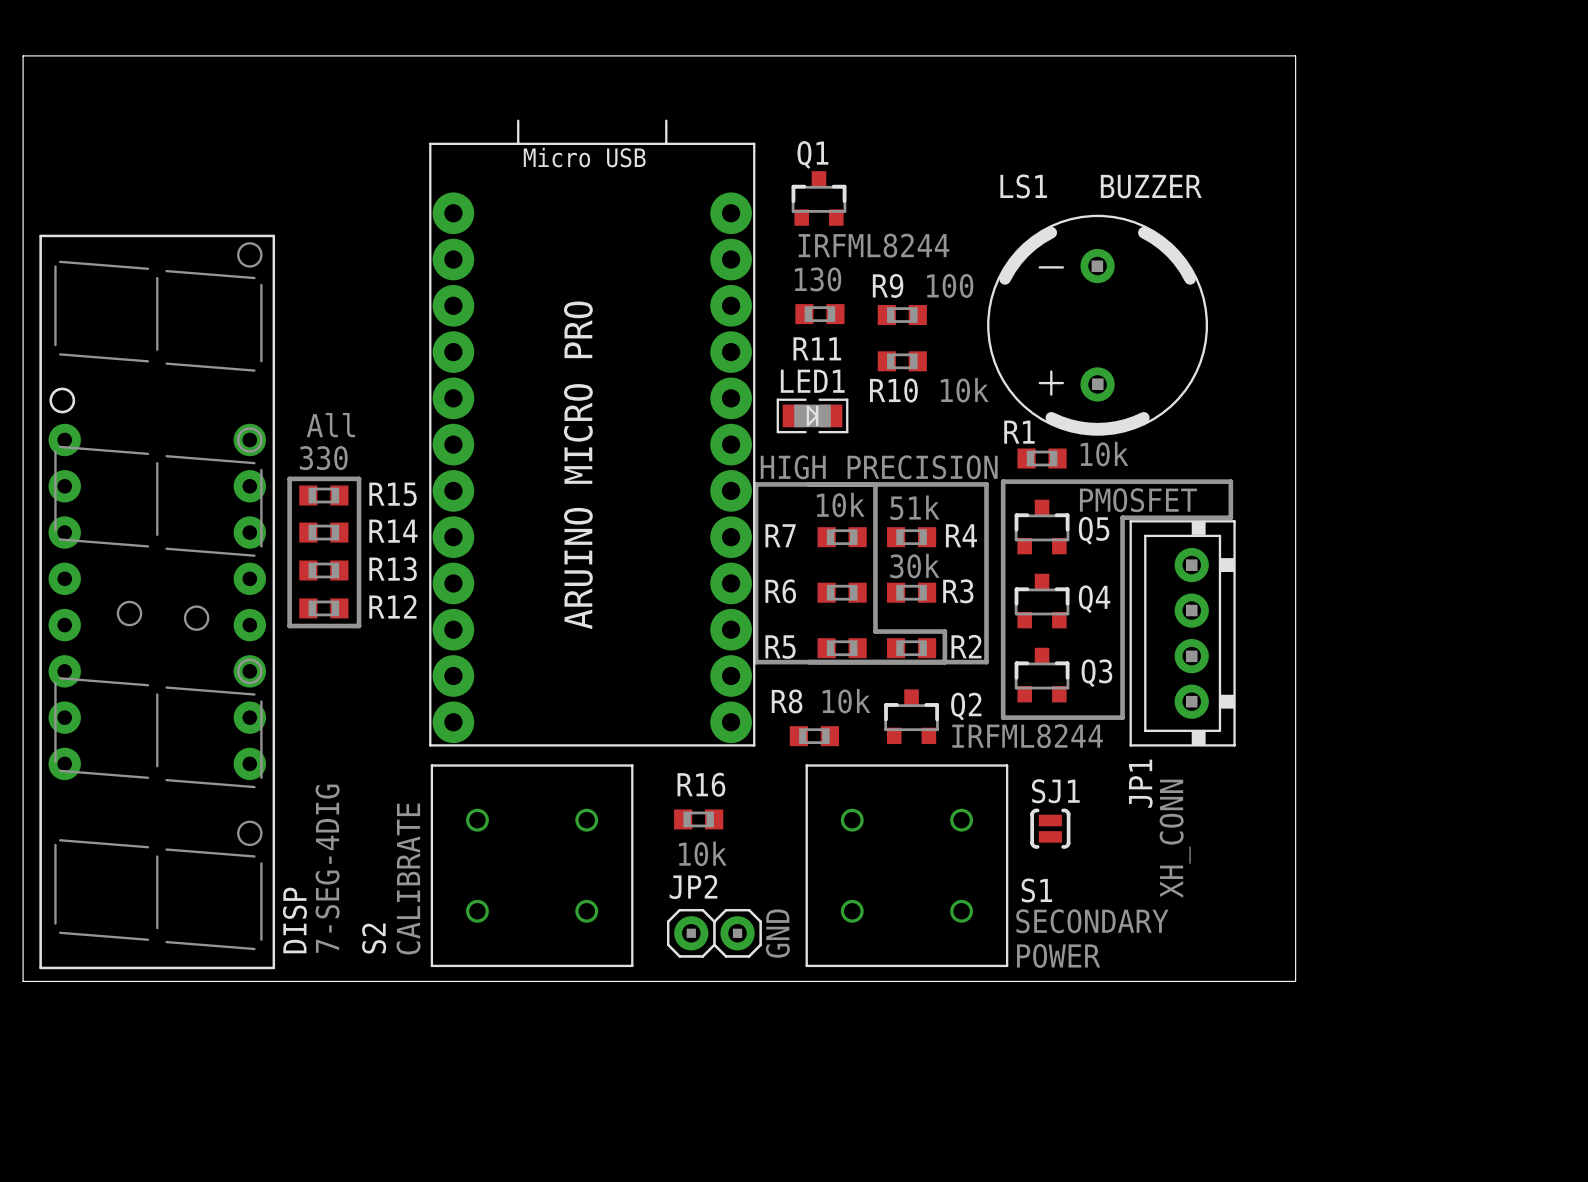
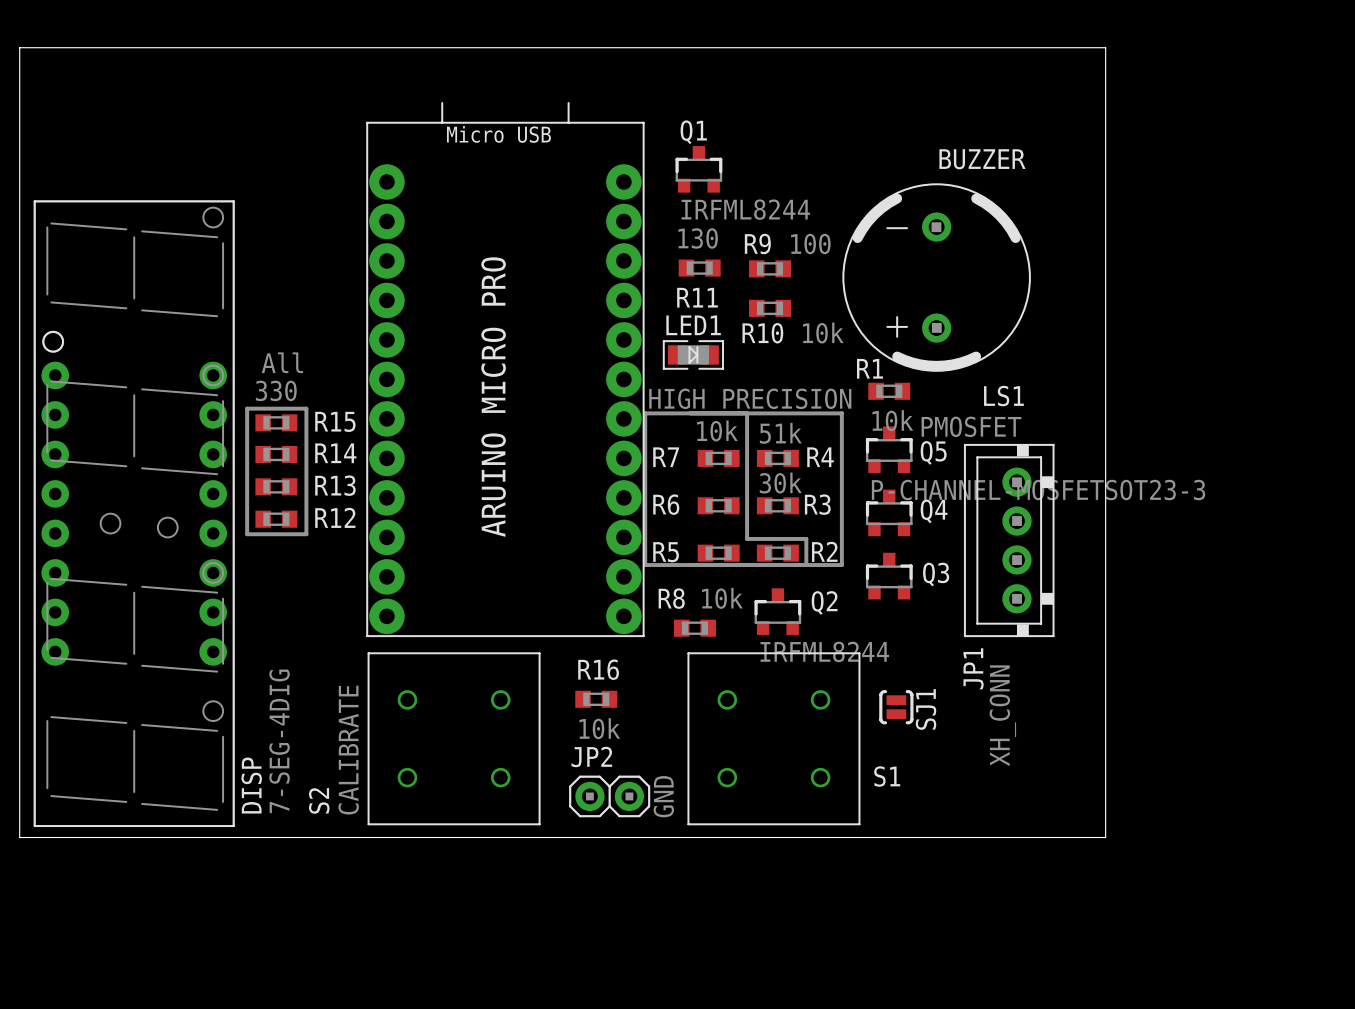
LS1 name position: LS1 (1023, 186) -> LS1 (1003, 396)
R1 value position: 10k (1104, 454) -> 10k (892, 420)
line: (1003, 481) (1230, 481) (1230, 517) (1122, 517) (1122, 717) (1003, 717) (1003, 481) -> none
Q5 value: none -> P-CHANNEL-MOSFETSOT23-3 (1038, 490)
Q2 value position: IRFML8244 (1027, 736) -> IRFML8244 (824, 651)
SJ1 name rotation: 0° (1055, 791) -> 90° counterclockwise (926, 709)
S1 name position: S1 (1036, 890) -> S1 (887, 776)
text: SECONDARY (1092, 921) -> none
text: POWER (1058, 955) -> none

